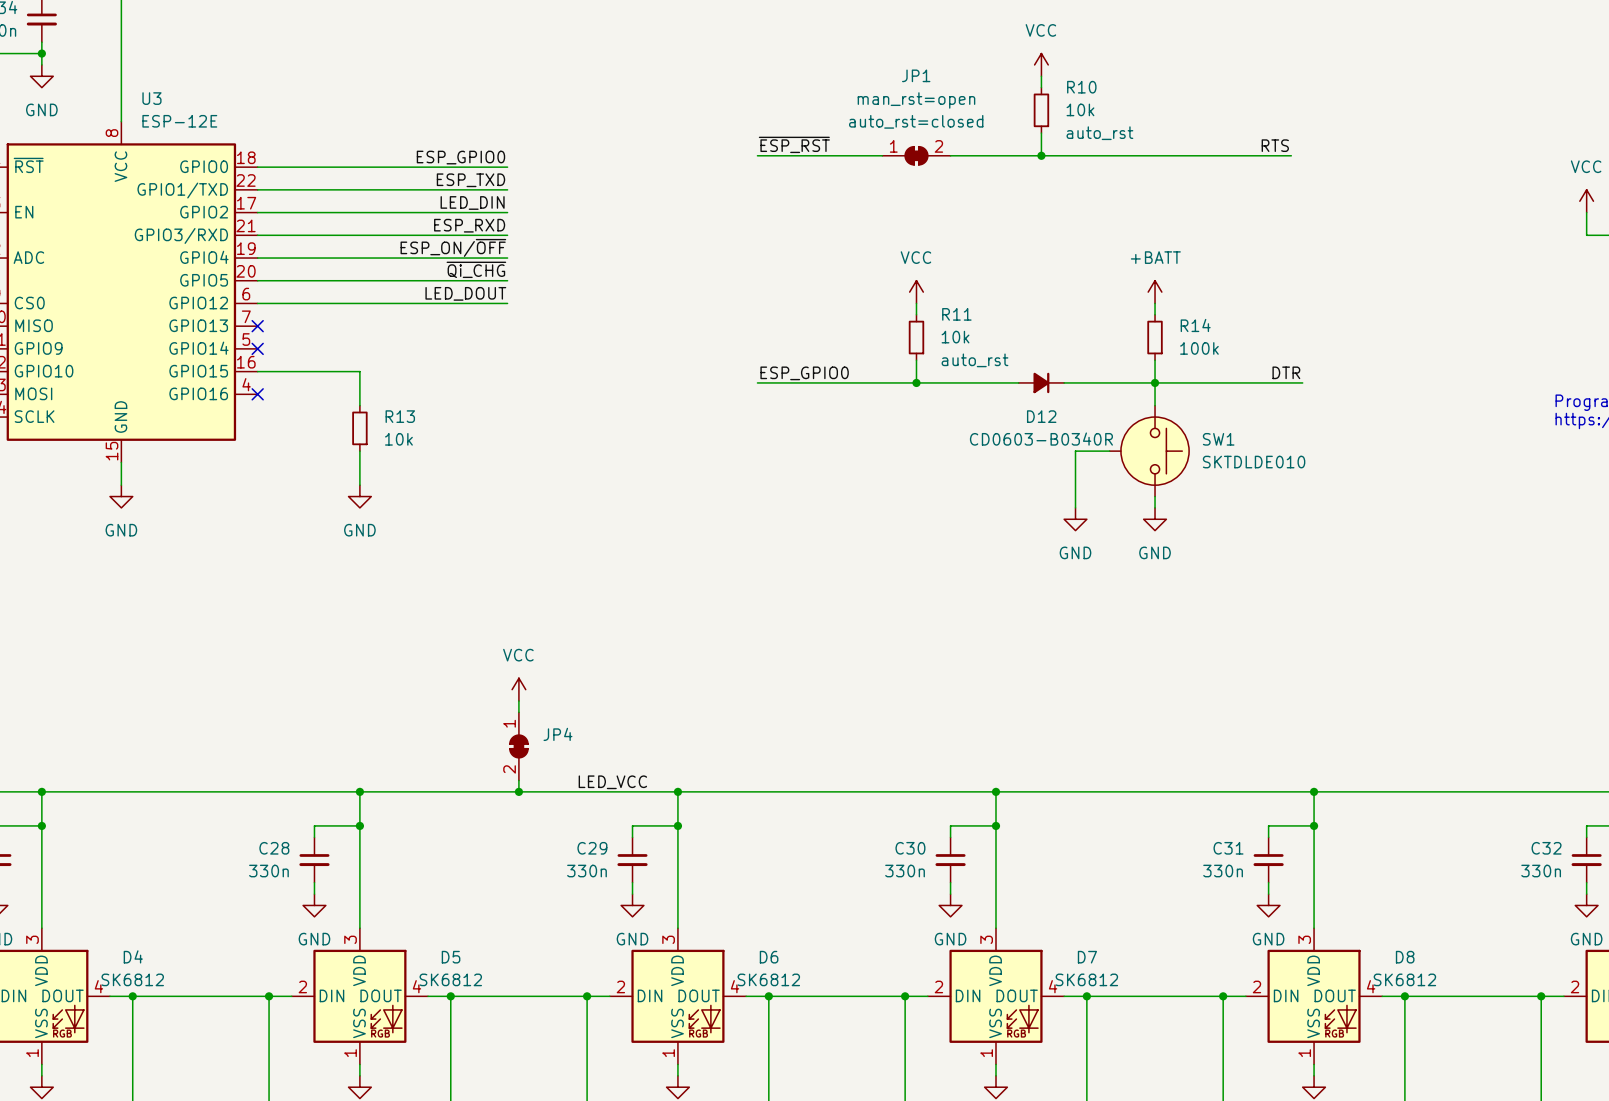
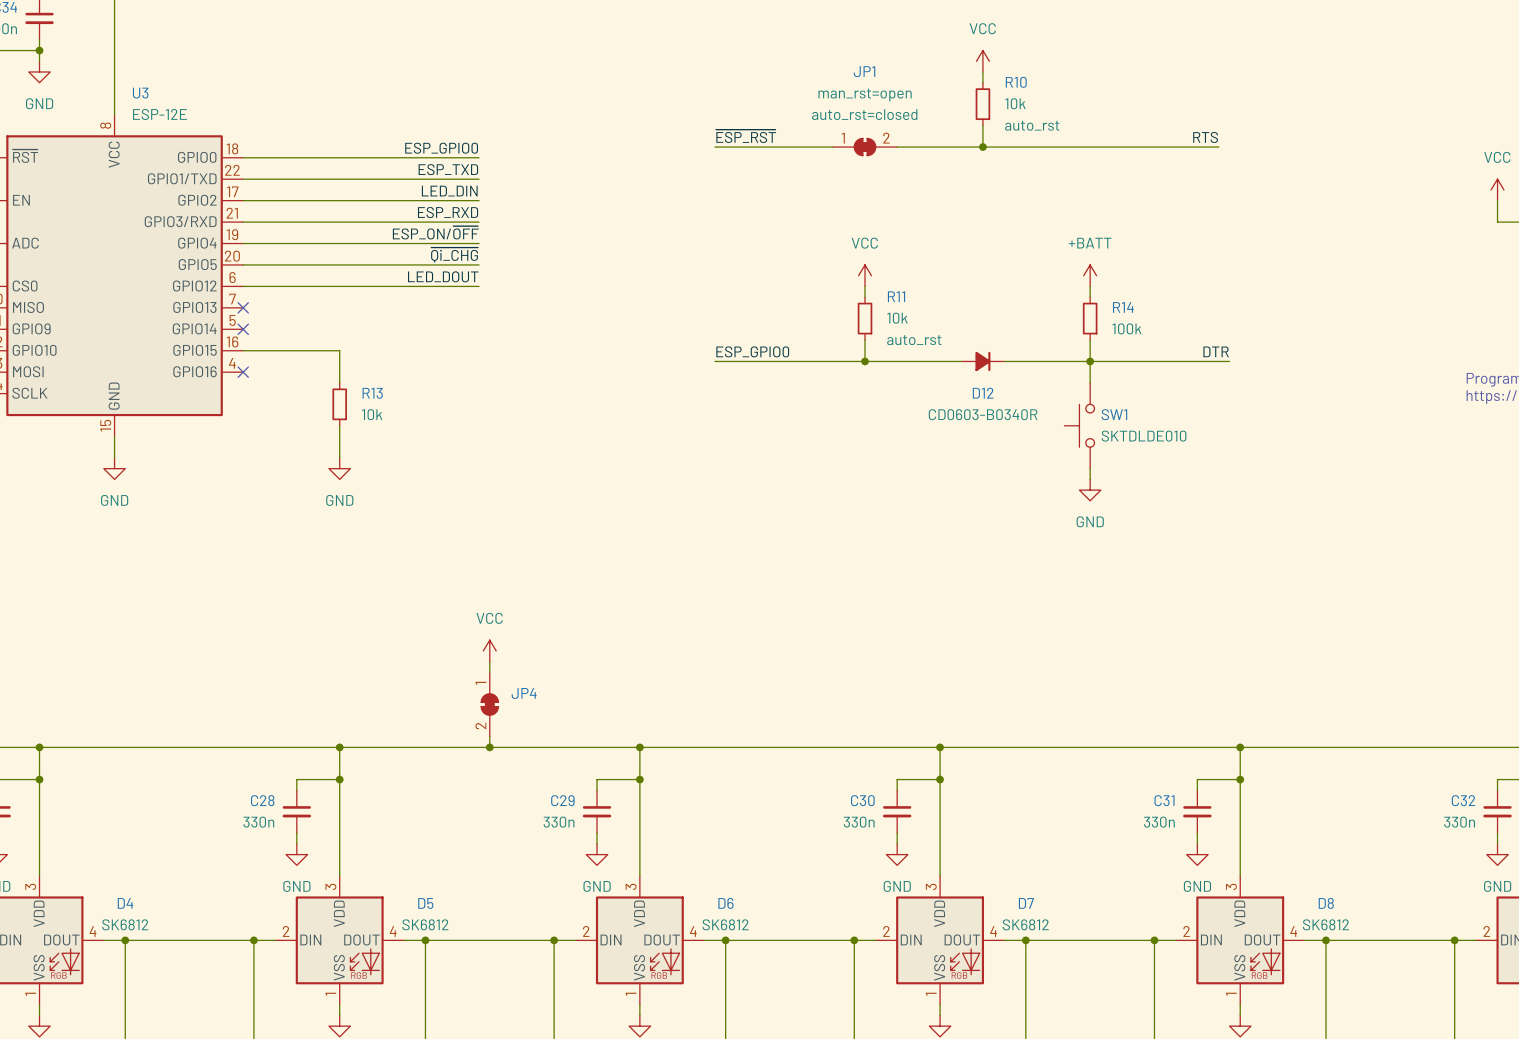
SW1 symbol: [1109, 405, 1190, 497] -> [1064, 382, 1095, 469]
SW1 name position: SW1 (1218, 439) -> SW1 (1114, 414)
wire: (1109, 451) (1075, 451) (1075, 507) -> none
SW1 value position: SKTDLDE010 (1254, 462) -> SKTDLDE010 (1144, 436)
power symbol: GND (1075, 519) -> none
label: LED_VCC (612, 782) -> none

